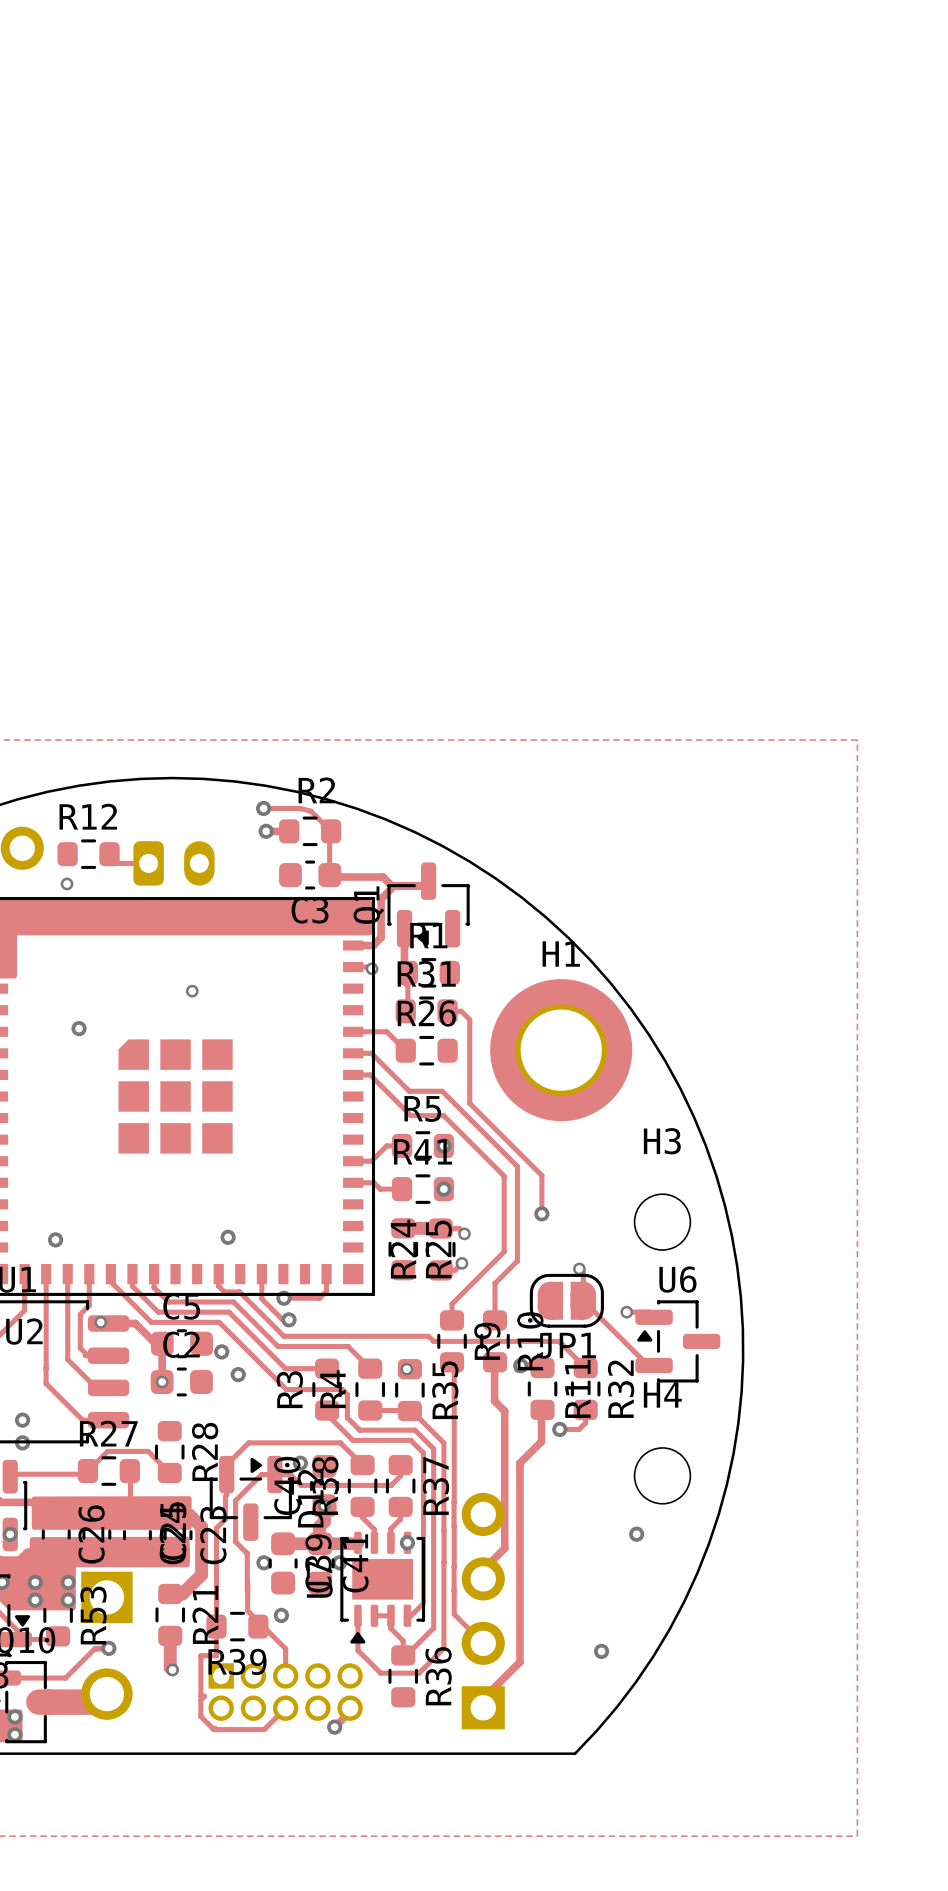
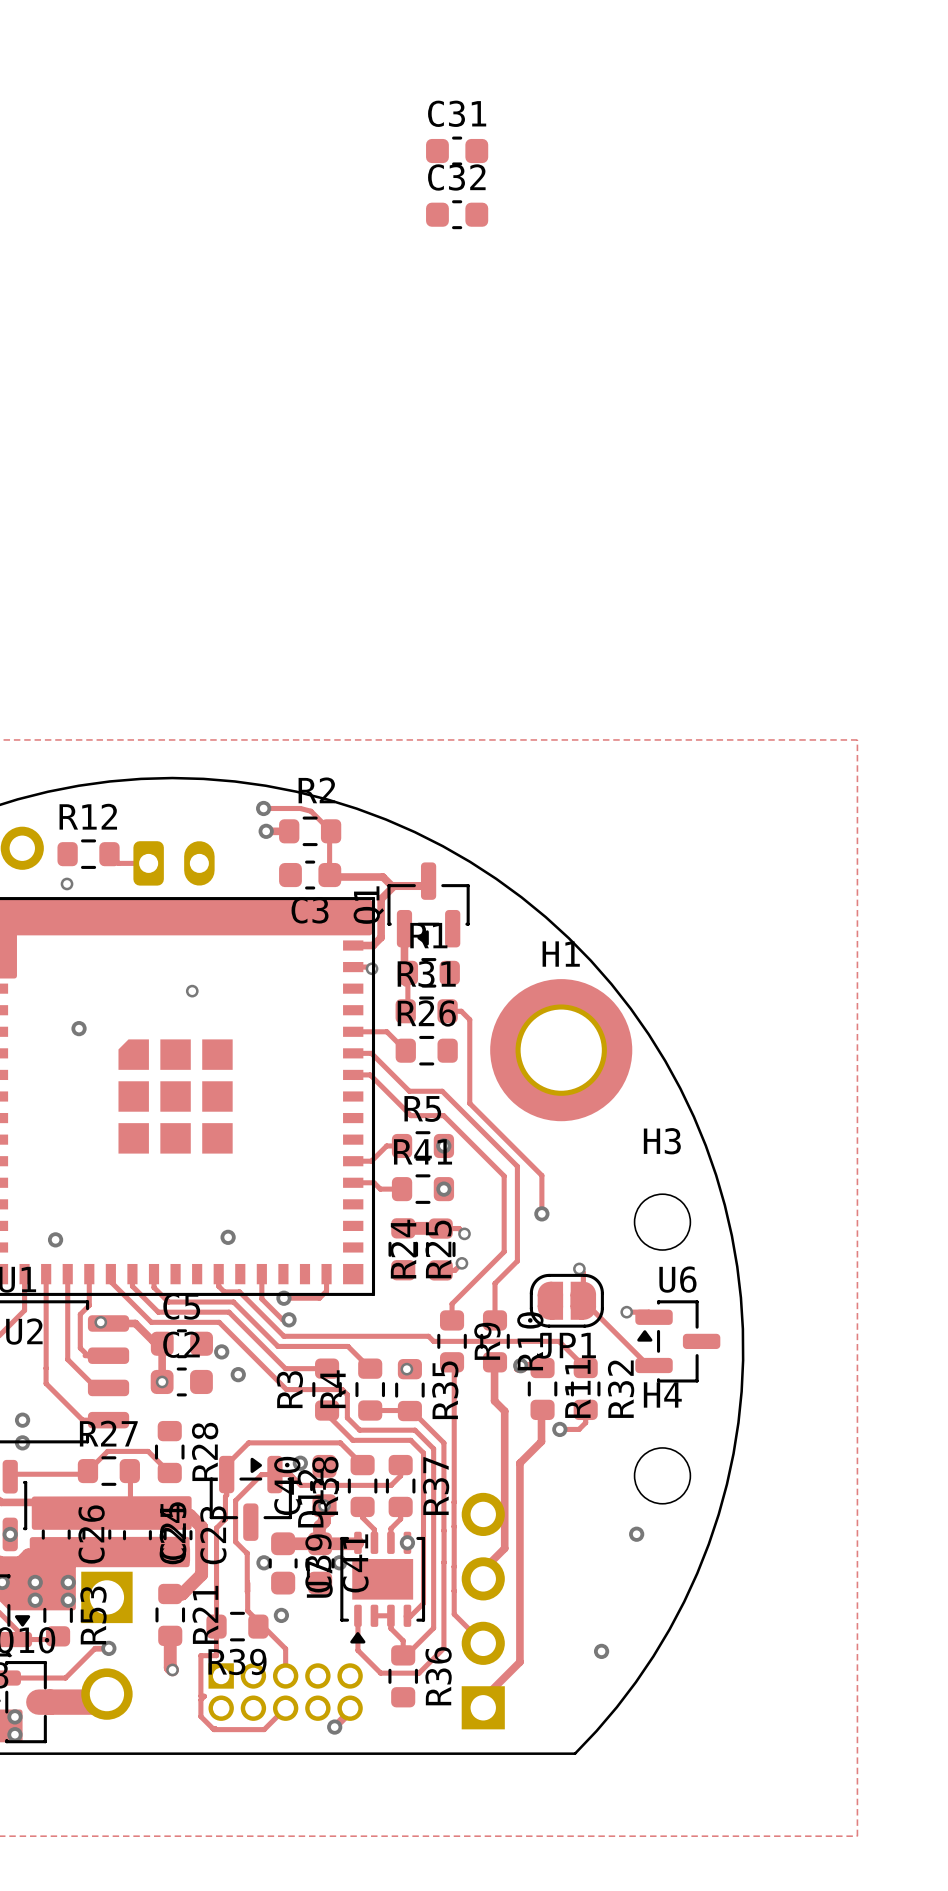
C31: none -> (457, 151)
C32: none -> (457, 214)

